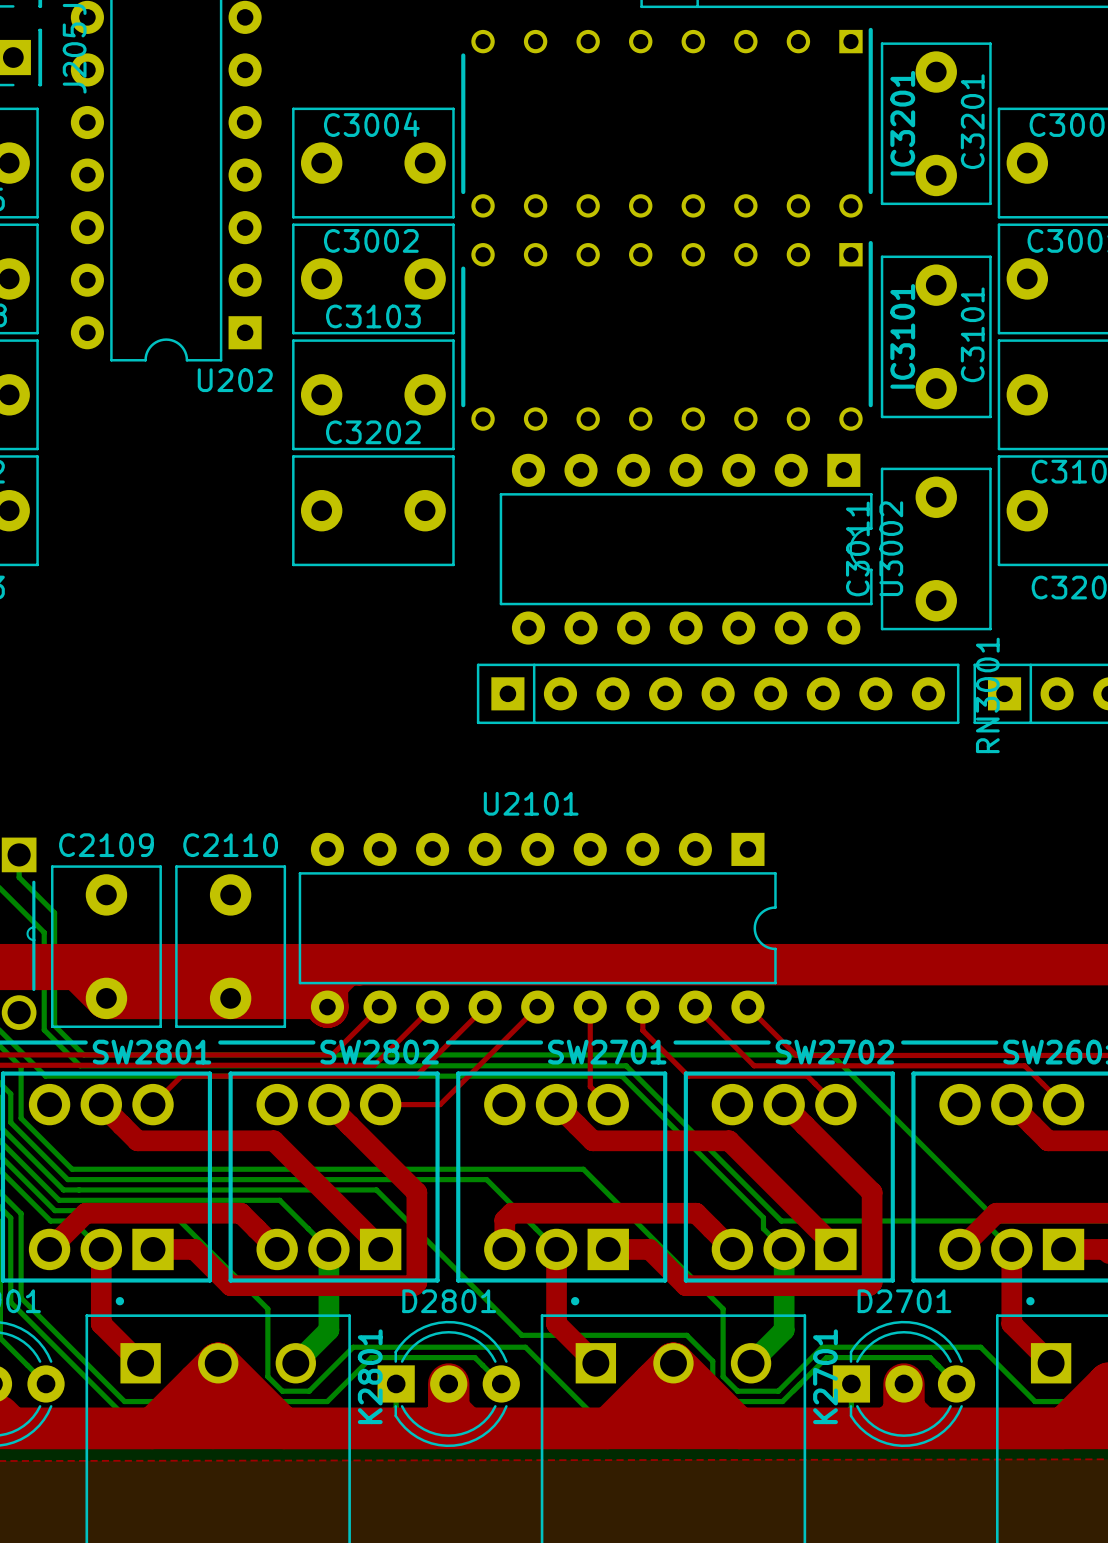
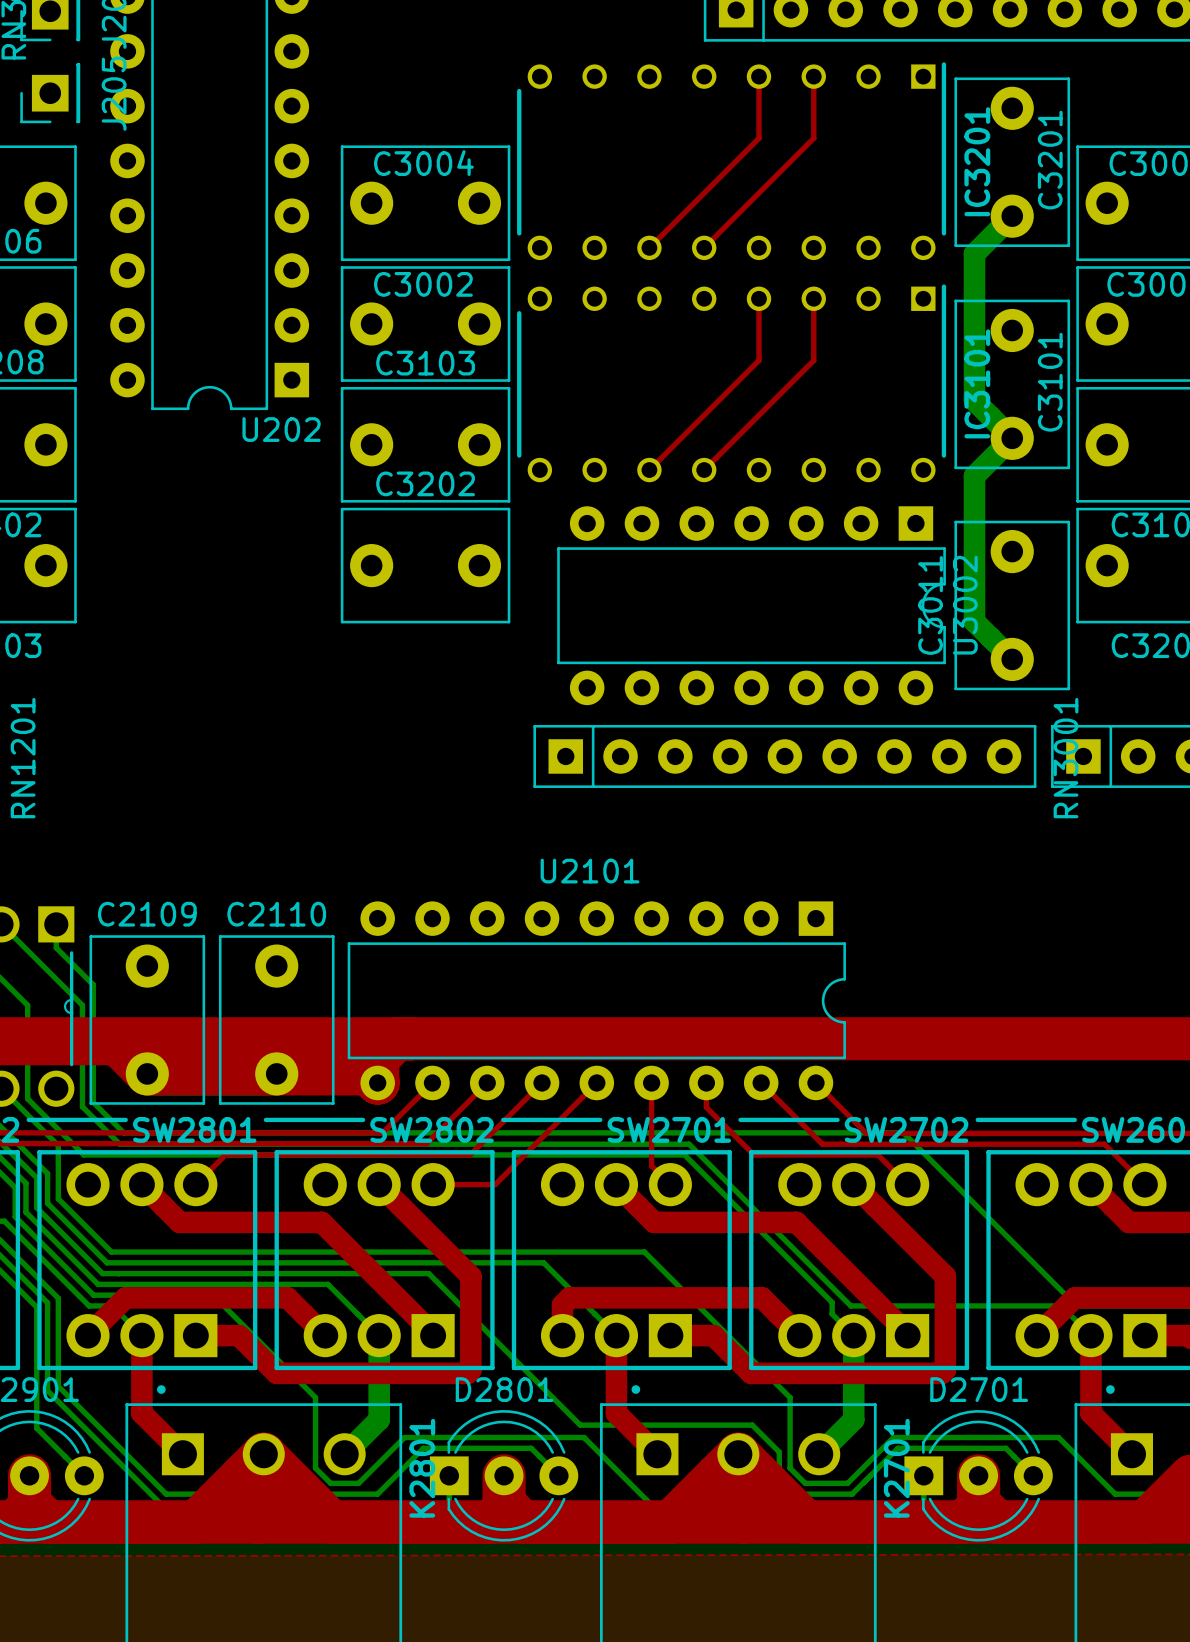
top track: none -> (758, 76) (758, 138) (649, 247)
top track: none -> (813, 76) (813, 138) (704, 247)
bottom track: none -> (1012, 216) (974, 253) (974, 400) (1012, 438) (974, 476) (974, 621) (1012, 659)
top track: none -> (758, 298) (758, 360) (649, 470)
top track: none -> (813, 298) (813, 360) (704, 470)

